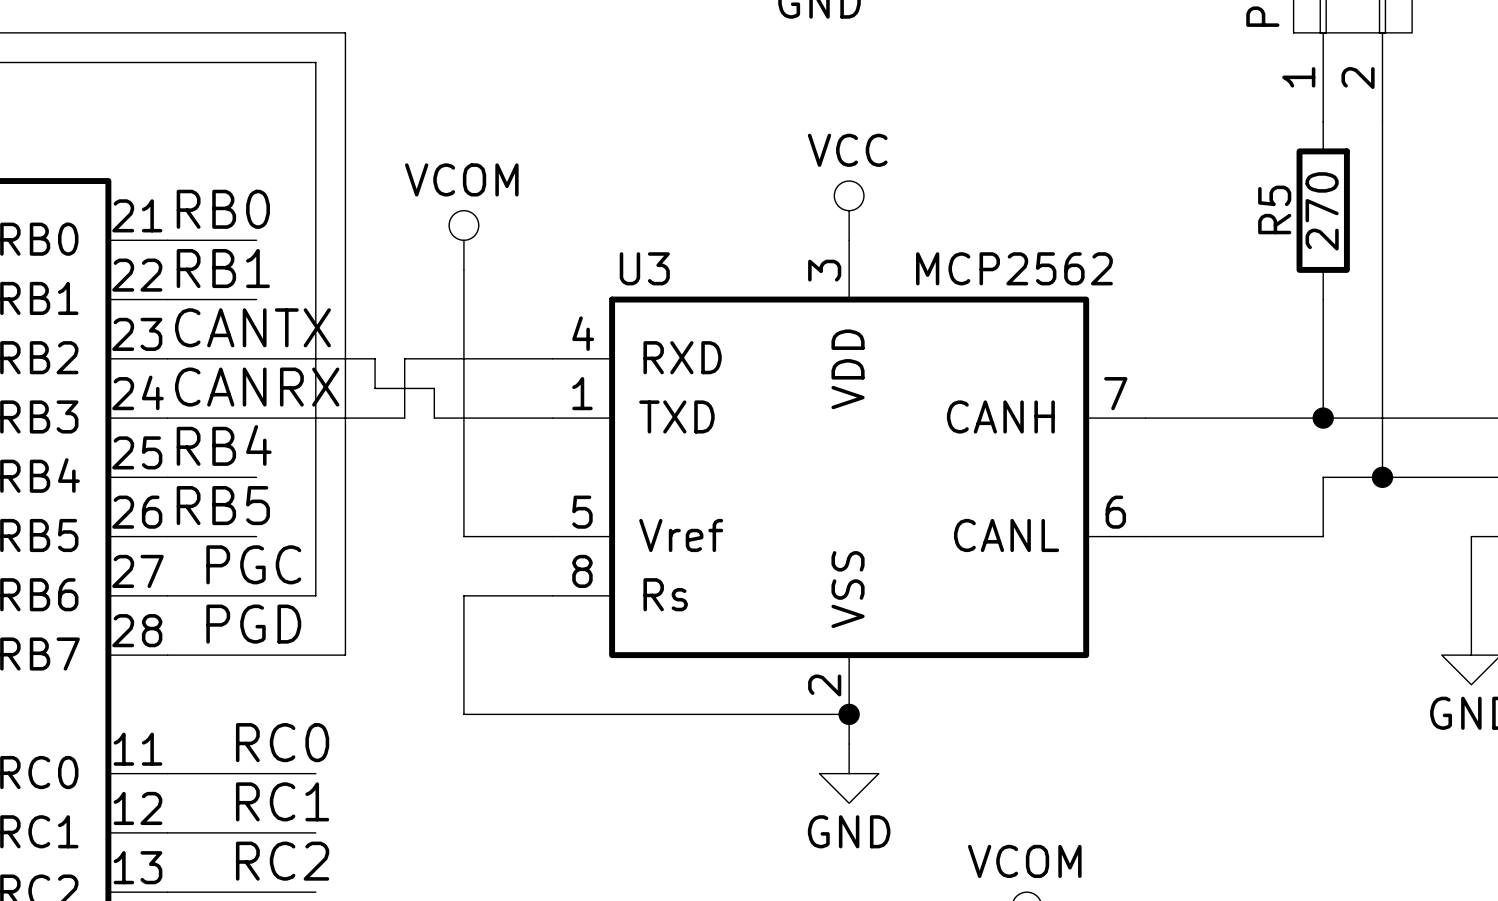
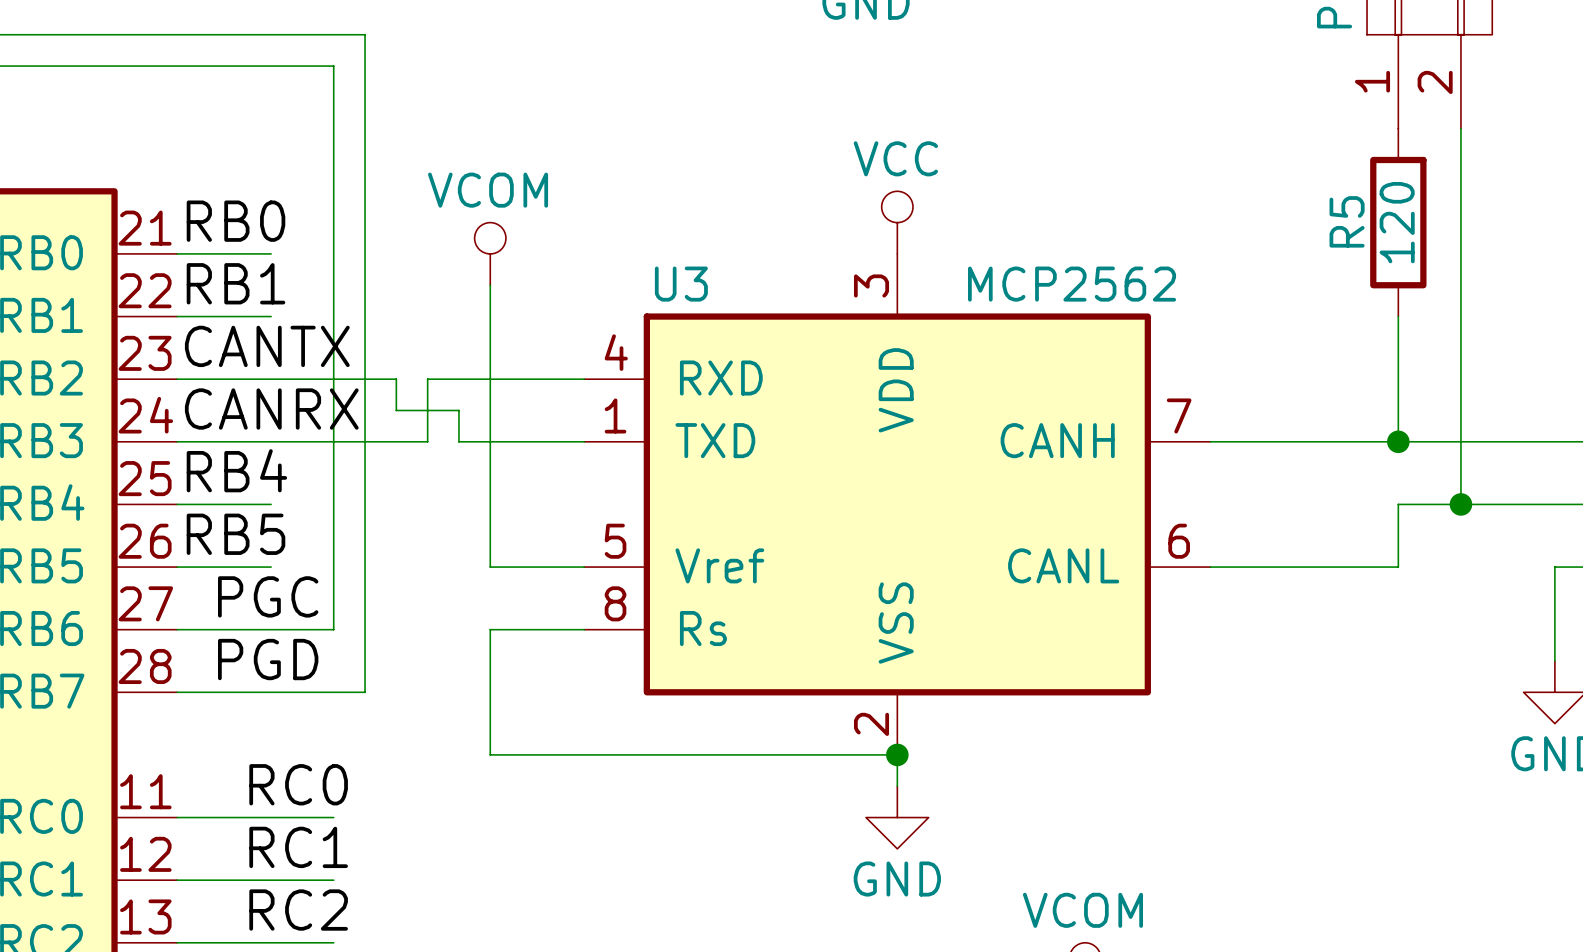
R5 value: 270 (1322, 211) -> 120 (1397, 222)

